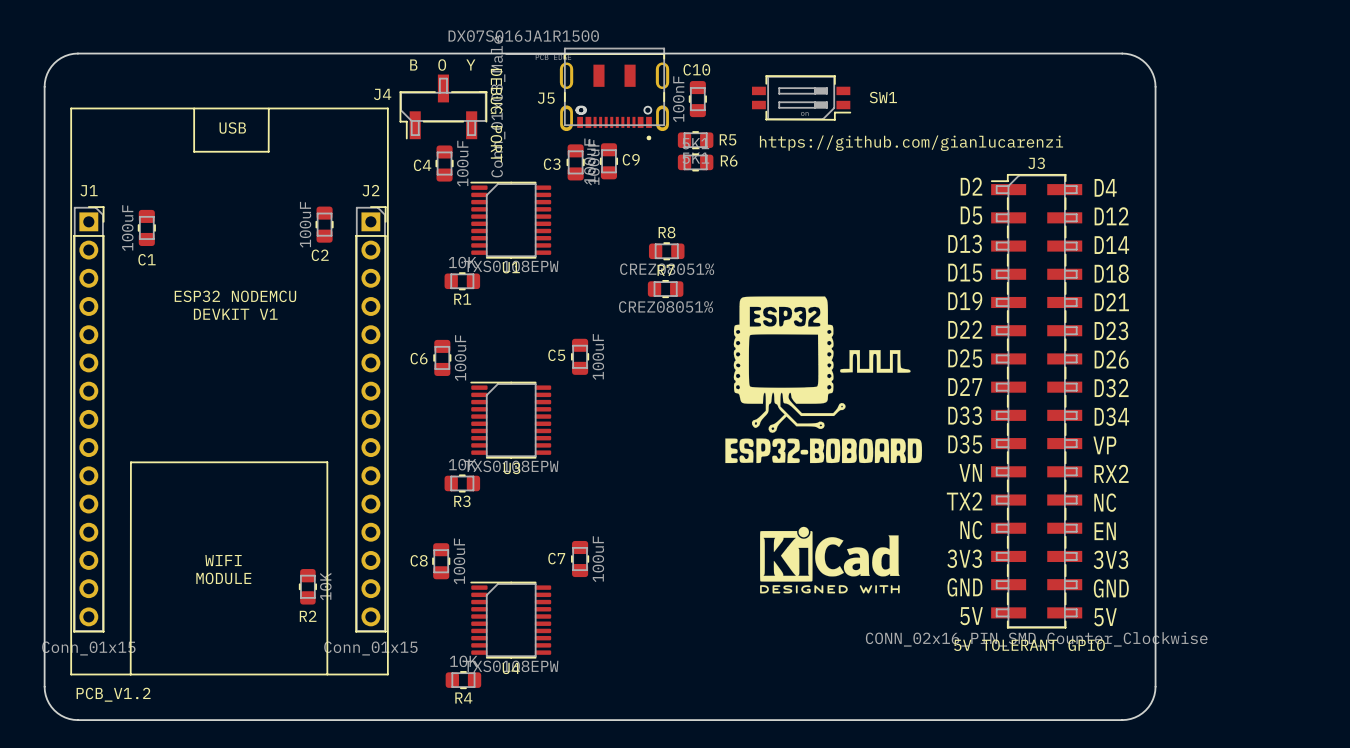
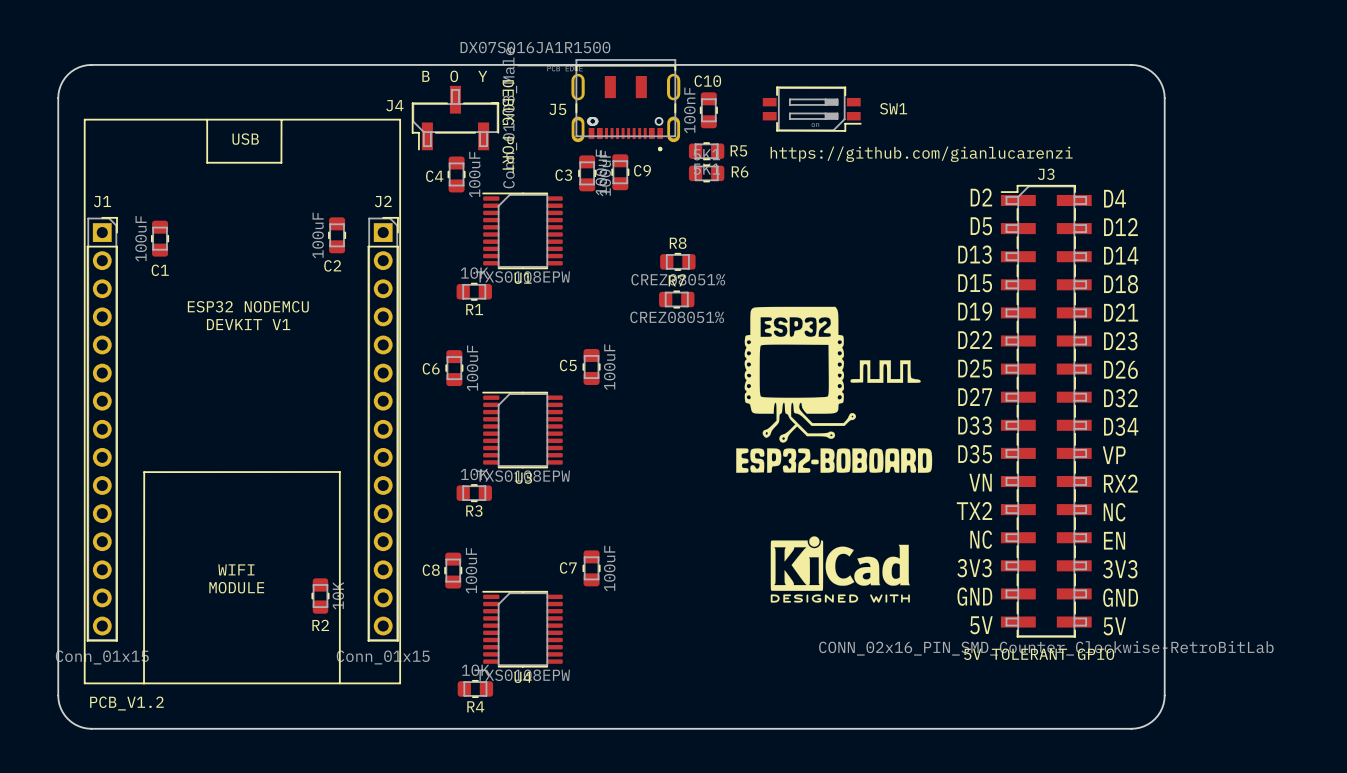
J3 value: CONN_02x16_PIN_SMD_Counter_Clockwise (1036, 639) -> CONN_02x16_PIN_SMD_Counter_Clockwise-RetroBitLab (1046, 648)

